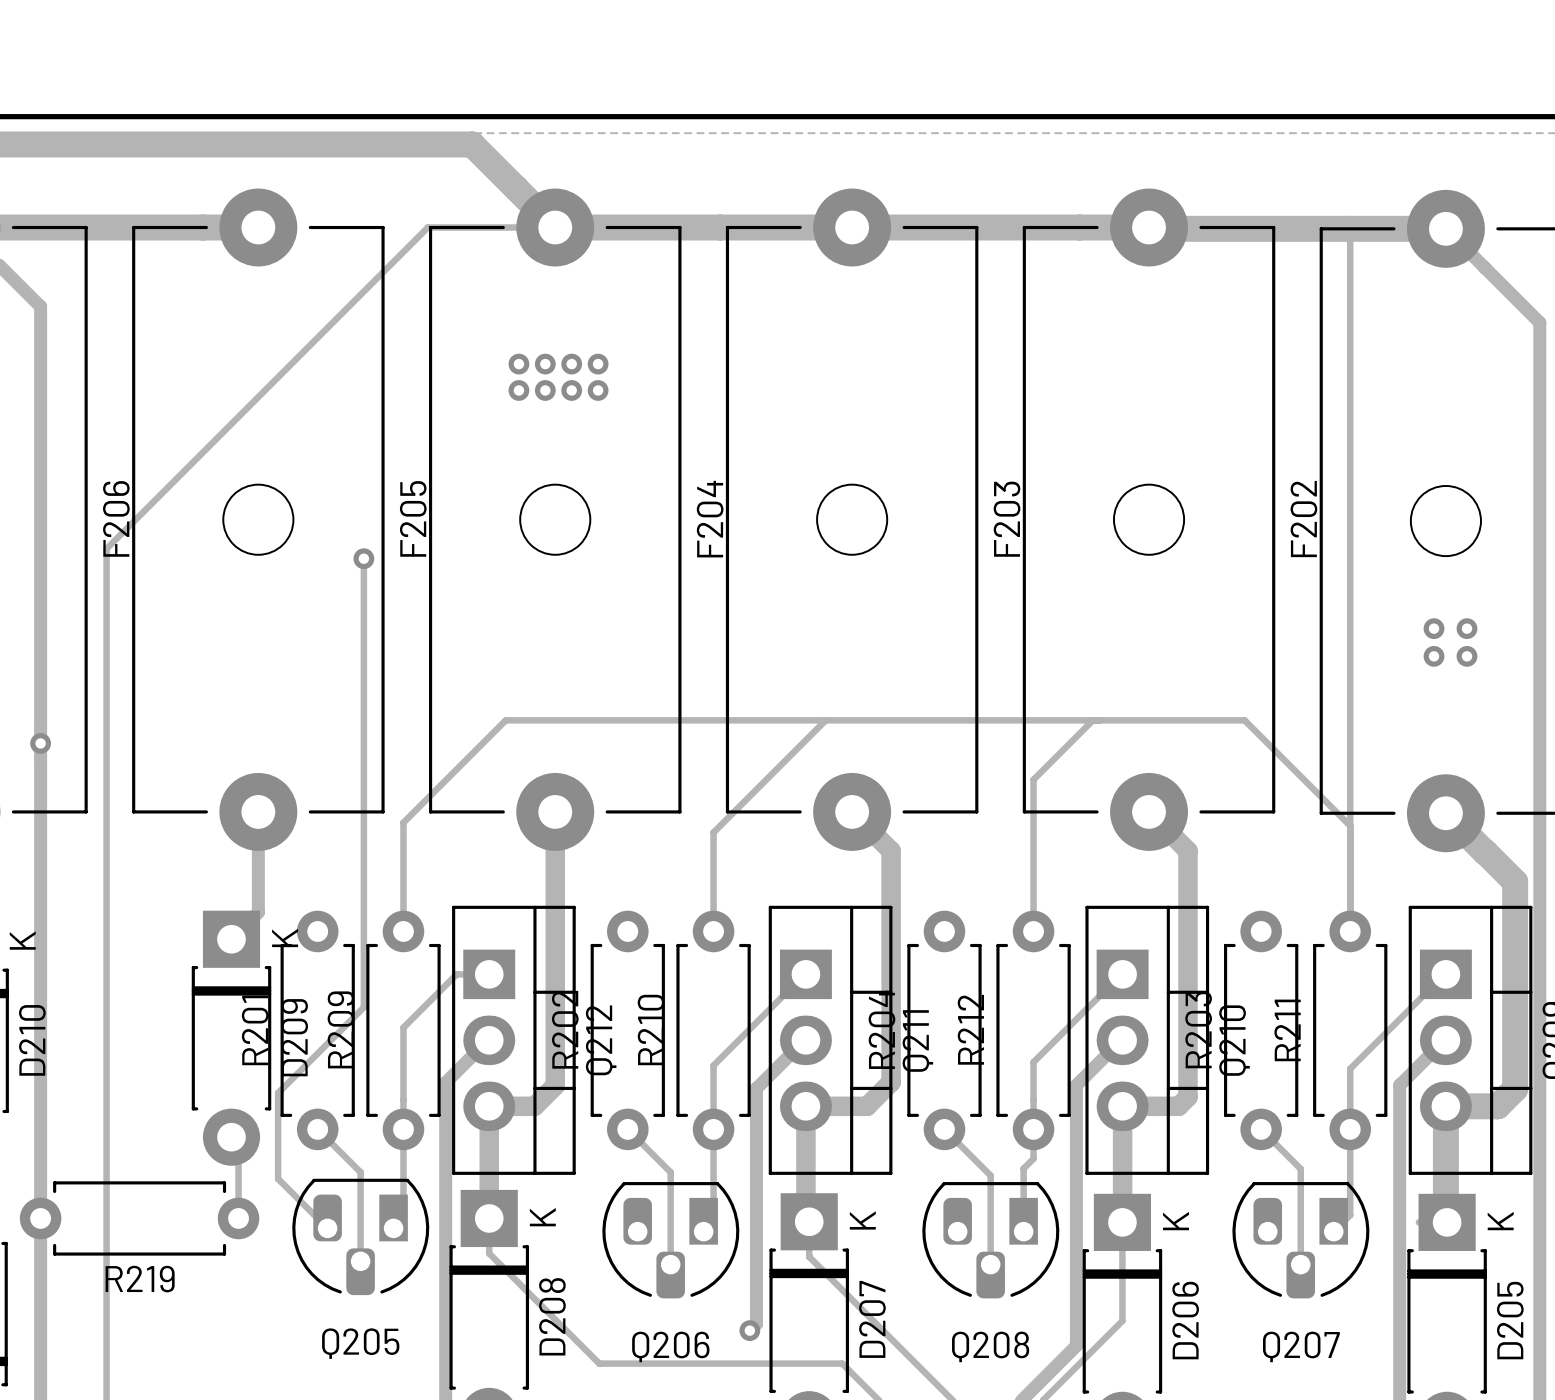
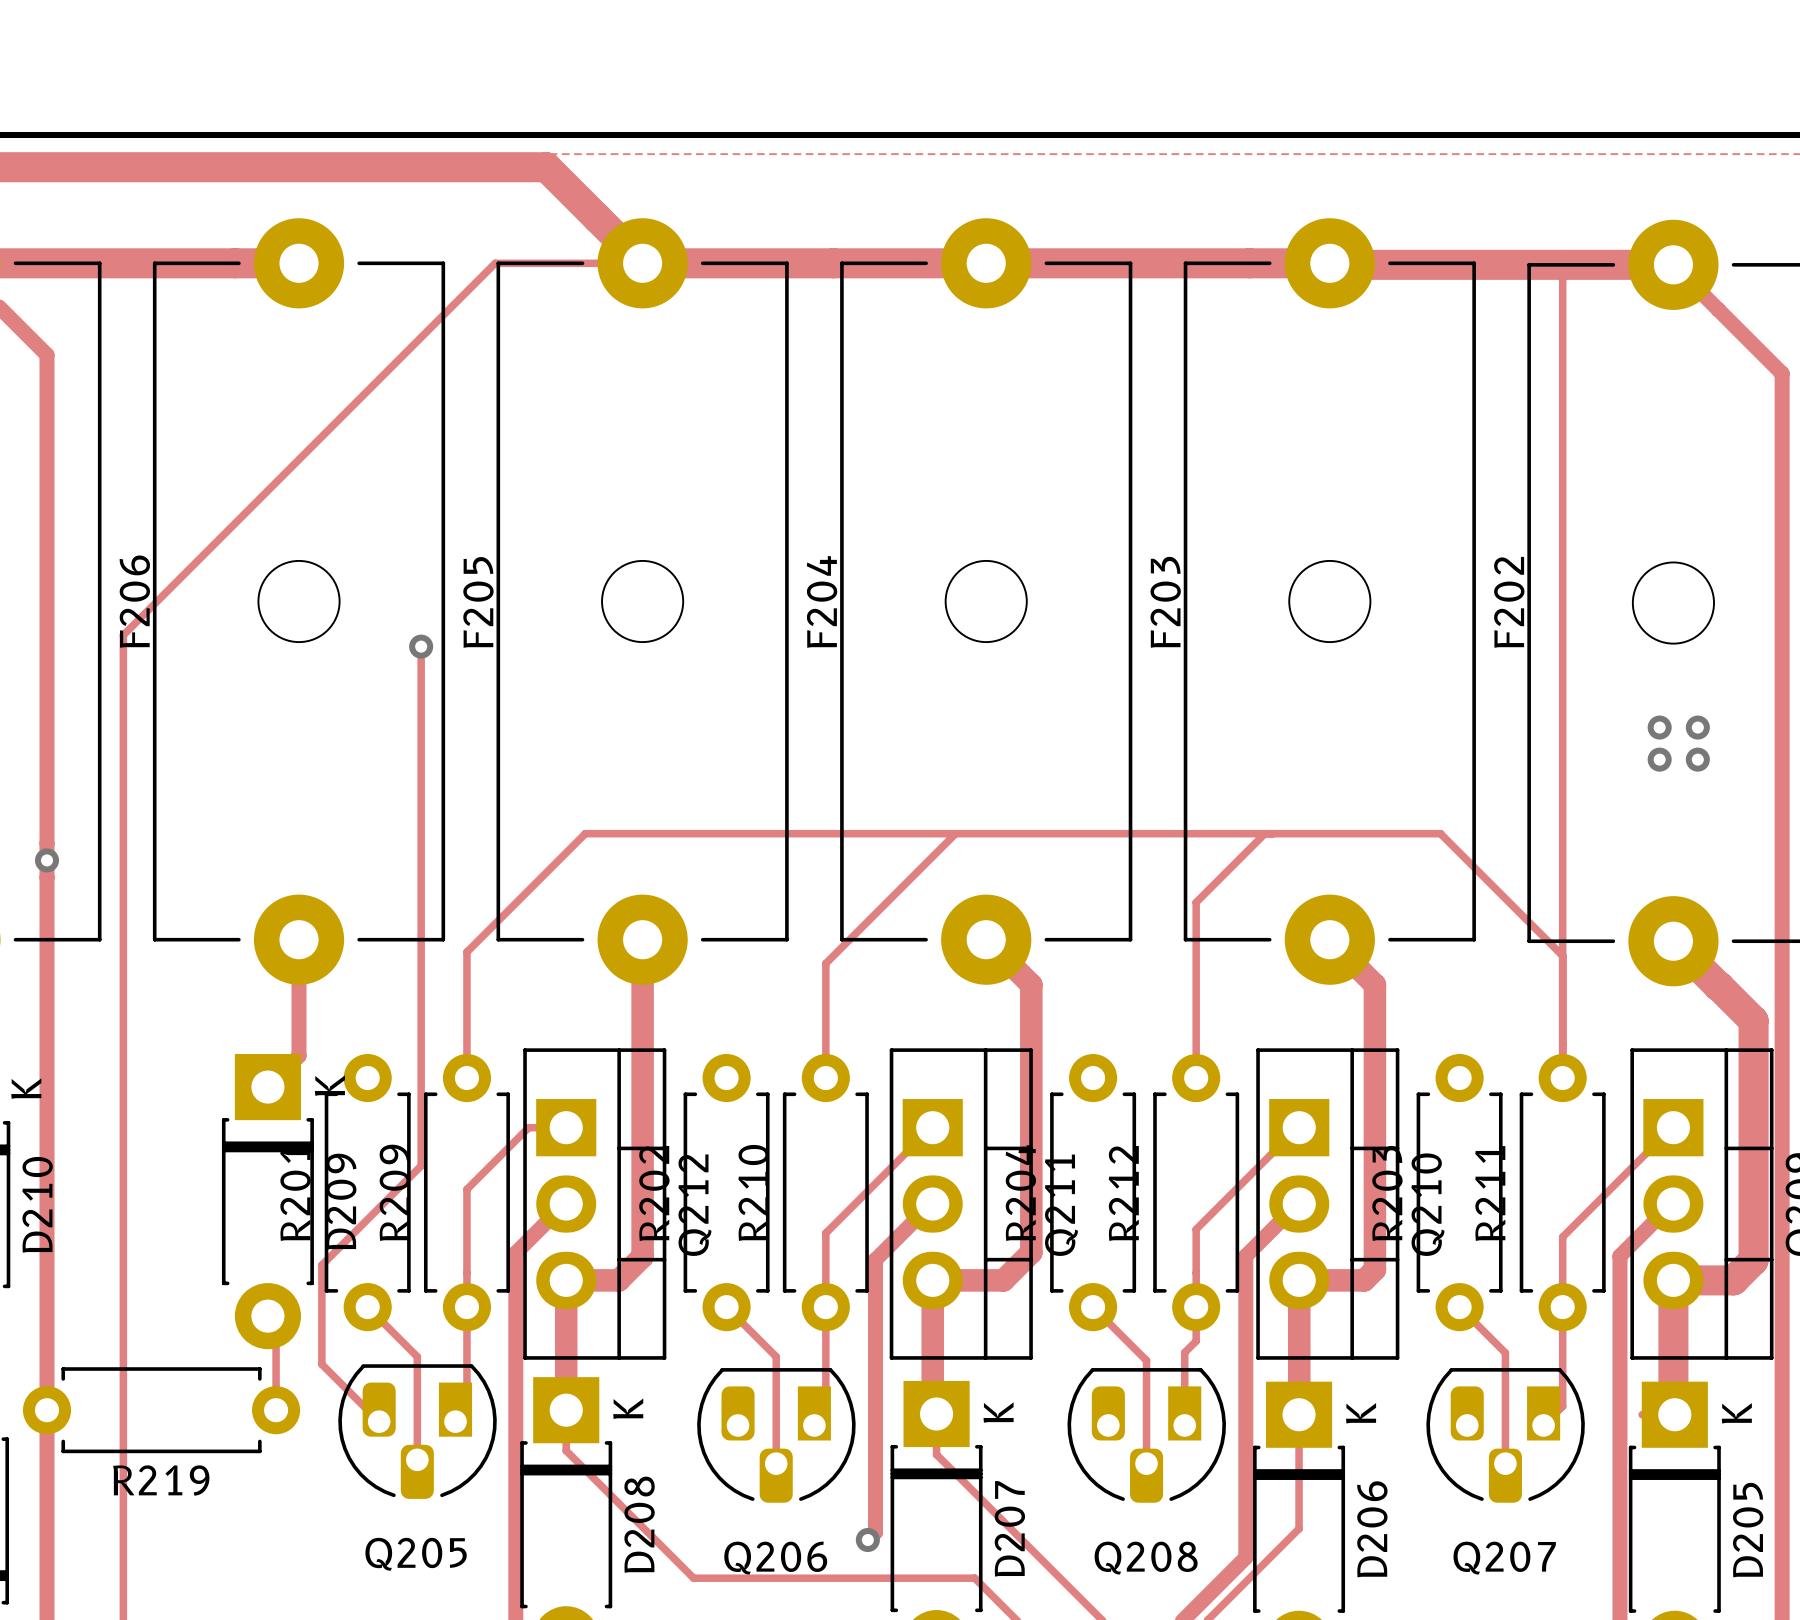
via: (518, 364) -> none
via: (545, 364) -> none
via: (571, 364) -> none
via: (598, 364) -> none
via: (518, 390) -> none
via: (545, 390) -> none
via: (571, 390) -> none
via: (598, 390) -> none

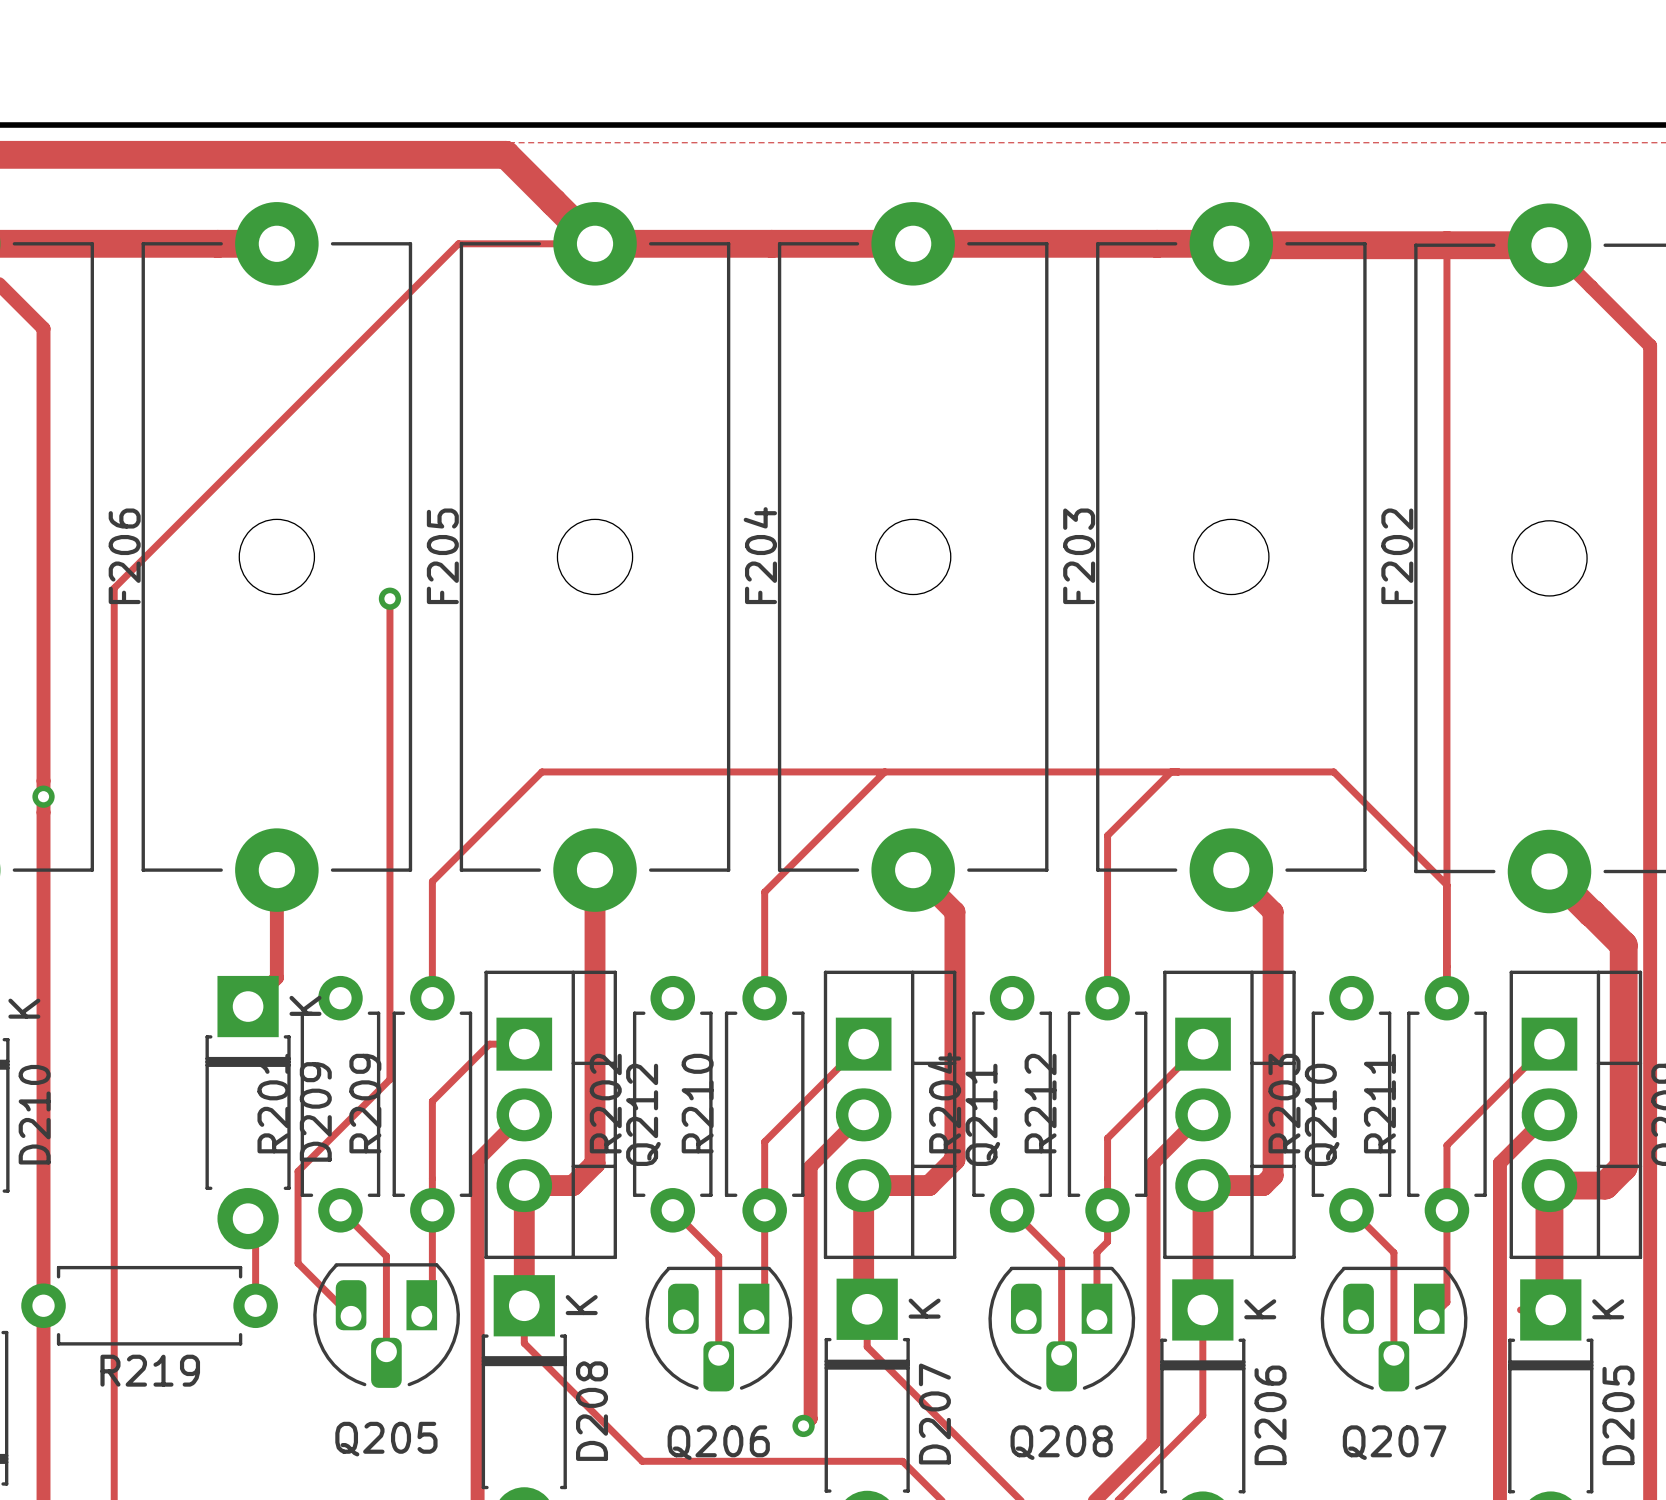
via: (1659, 727) -> none
via: (1697, 727) -> none
via: (1659, 759) -> none
via: (1697, 759) -> none

